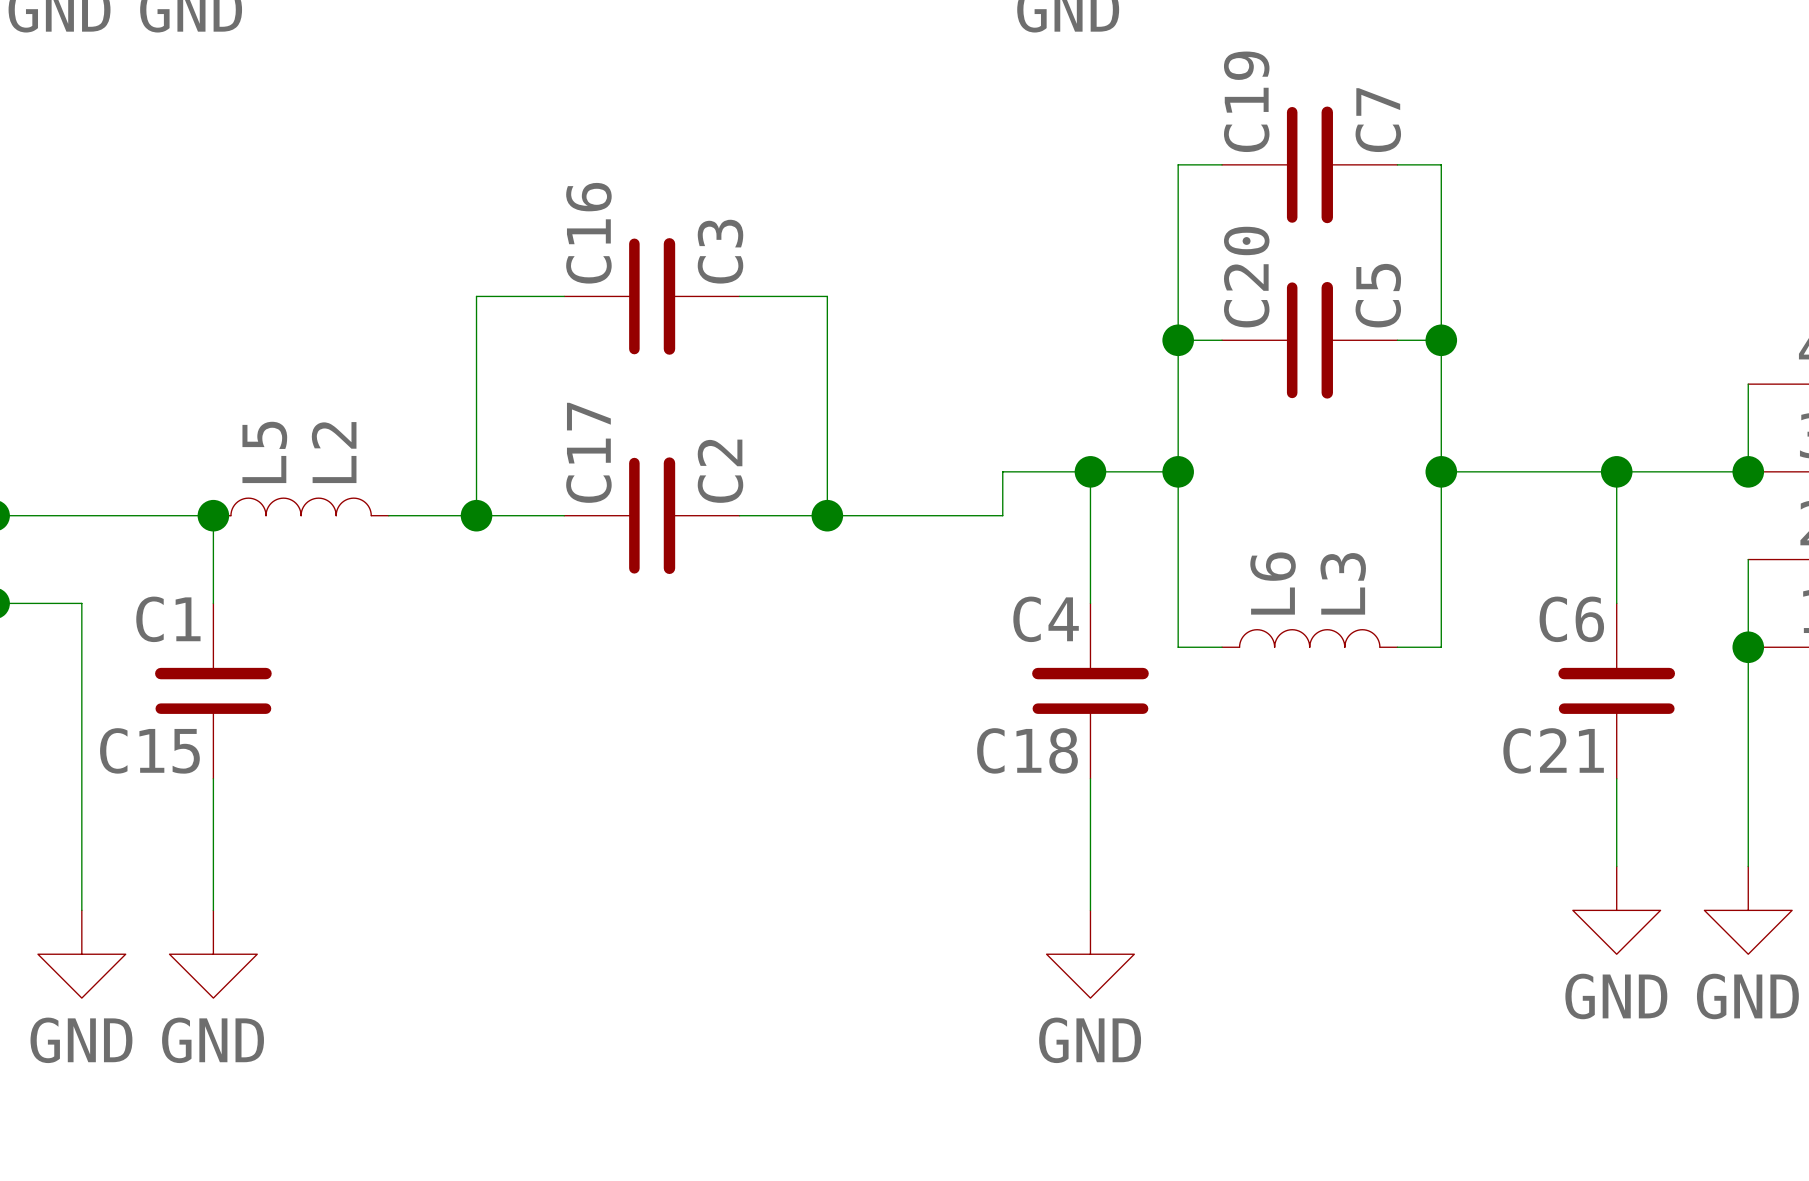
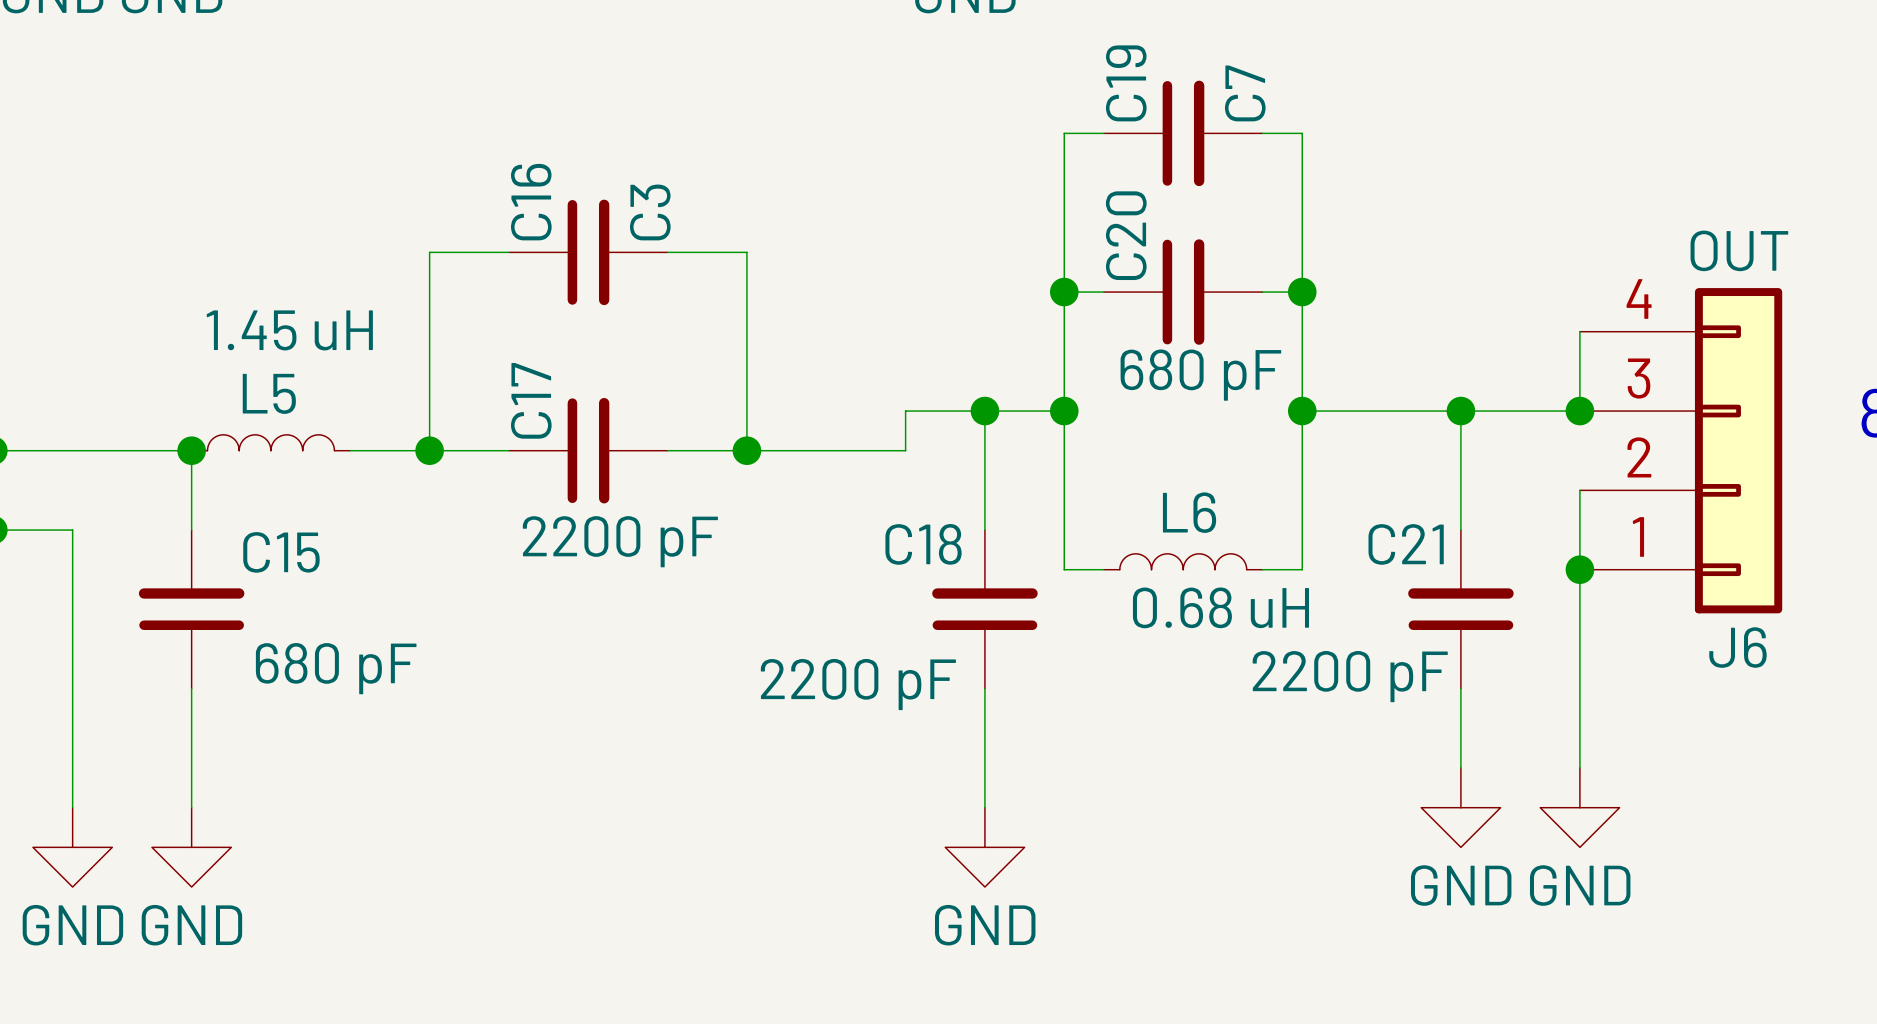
C20 value: C5 (1378, 295) -> 680 pF (1200, 375)
L5 name rotation: 0° (264, 452) -> 90° clockwise (269, 393)
L5 value: L2 (334, 452) -> 1.45 uH (289, 330)
C17 value: C2 (720, 471) -> 2200 pF (620, 541)
L6 name rotation: 0° (1273, 583) -> 90° clockwise (1189, 512)
L6 value: L3 (1343, 583) -> 0.68 uH (1220, 607)
C15 value: C1 (168, 619) -> 680 pF (336, 668)
C18 value: C4 (1046, 619) -> 2200 pF (858, 684)
C21 value: C6 (1571, 619) -> 2200 pF (1350, 676)
C15 name position: C15 (149, 750) -> C15 (281, 552)
C18 name position: C18 (1027, 750) -> C18 (923, 544)
C21 name position: C21 (1553, 750) -> C21 (1406, 544)

